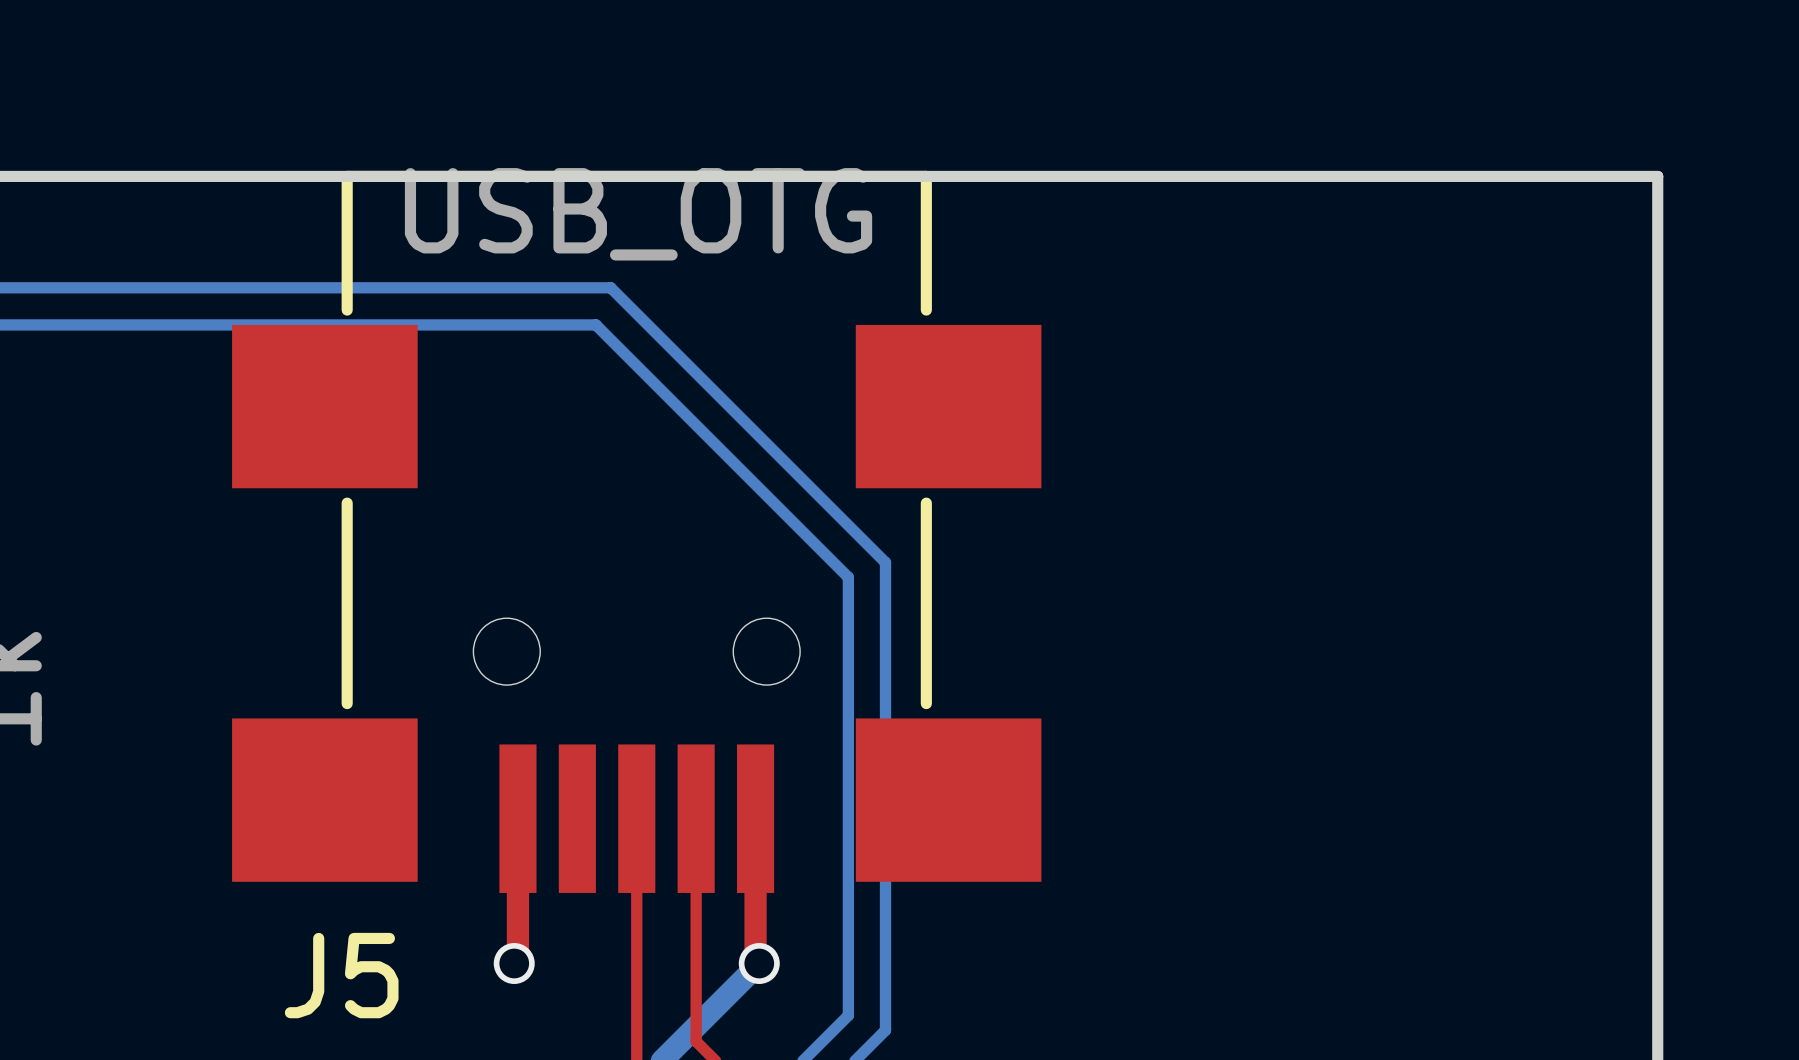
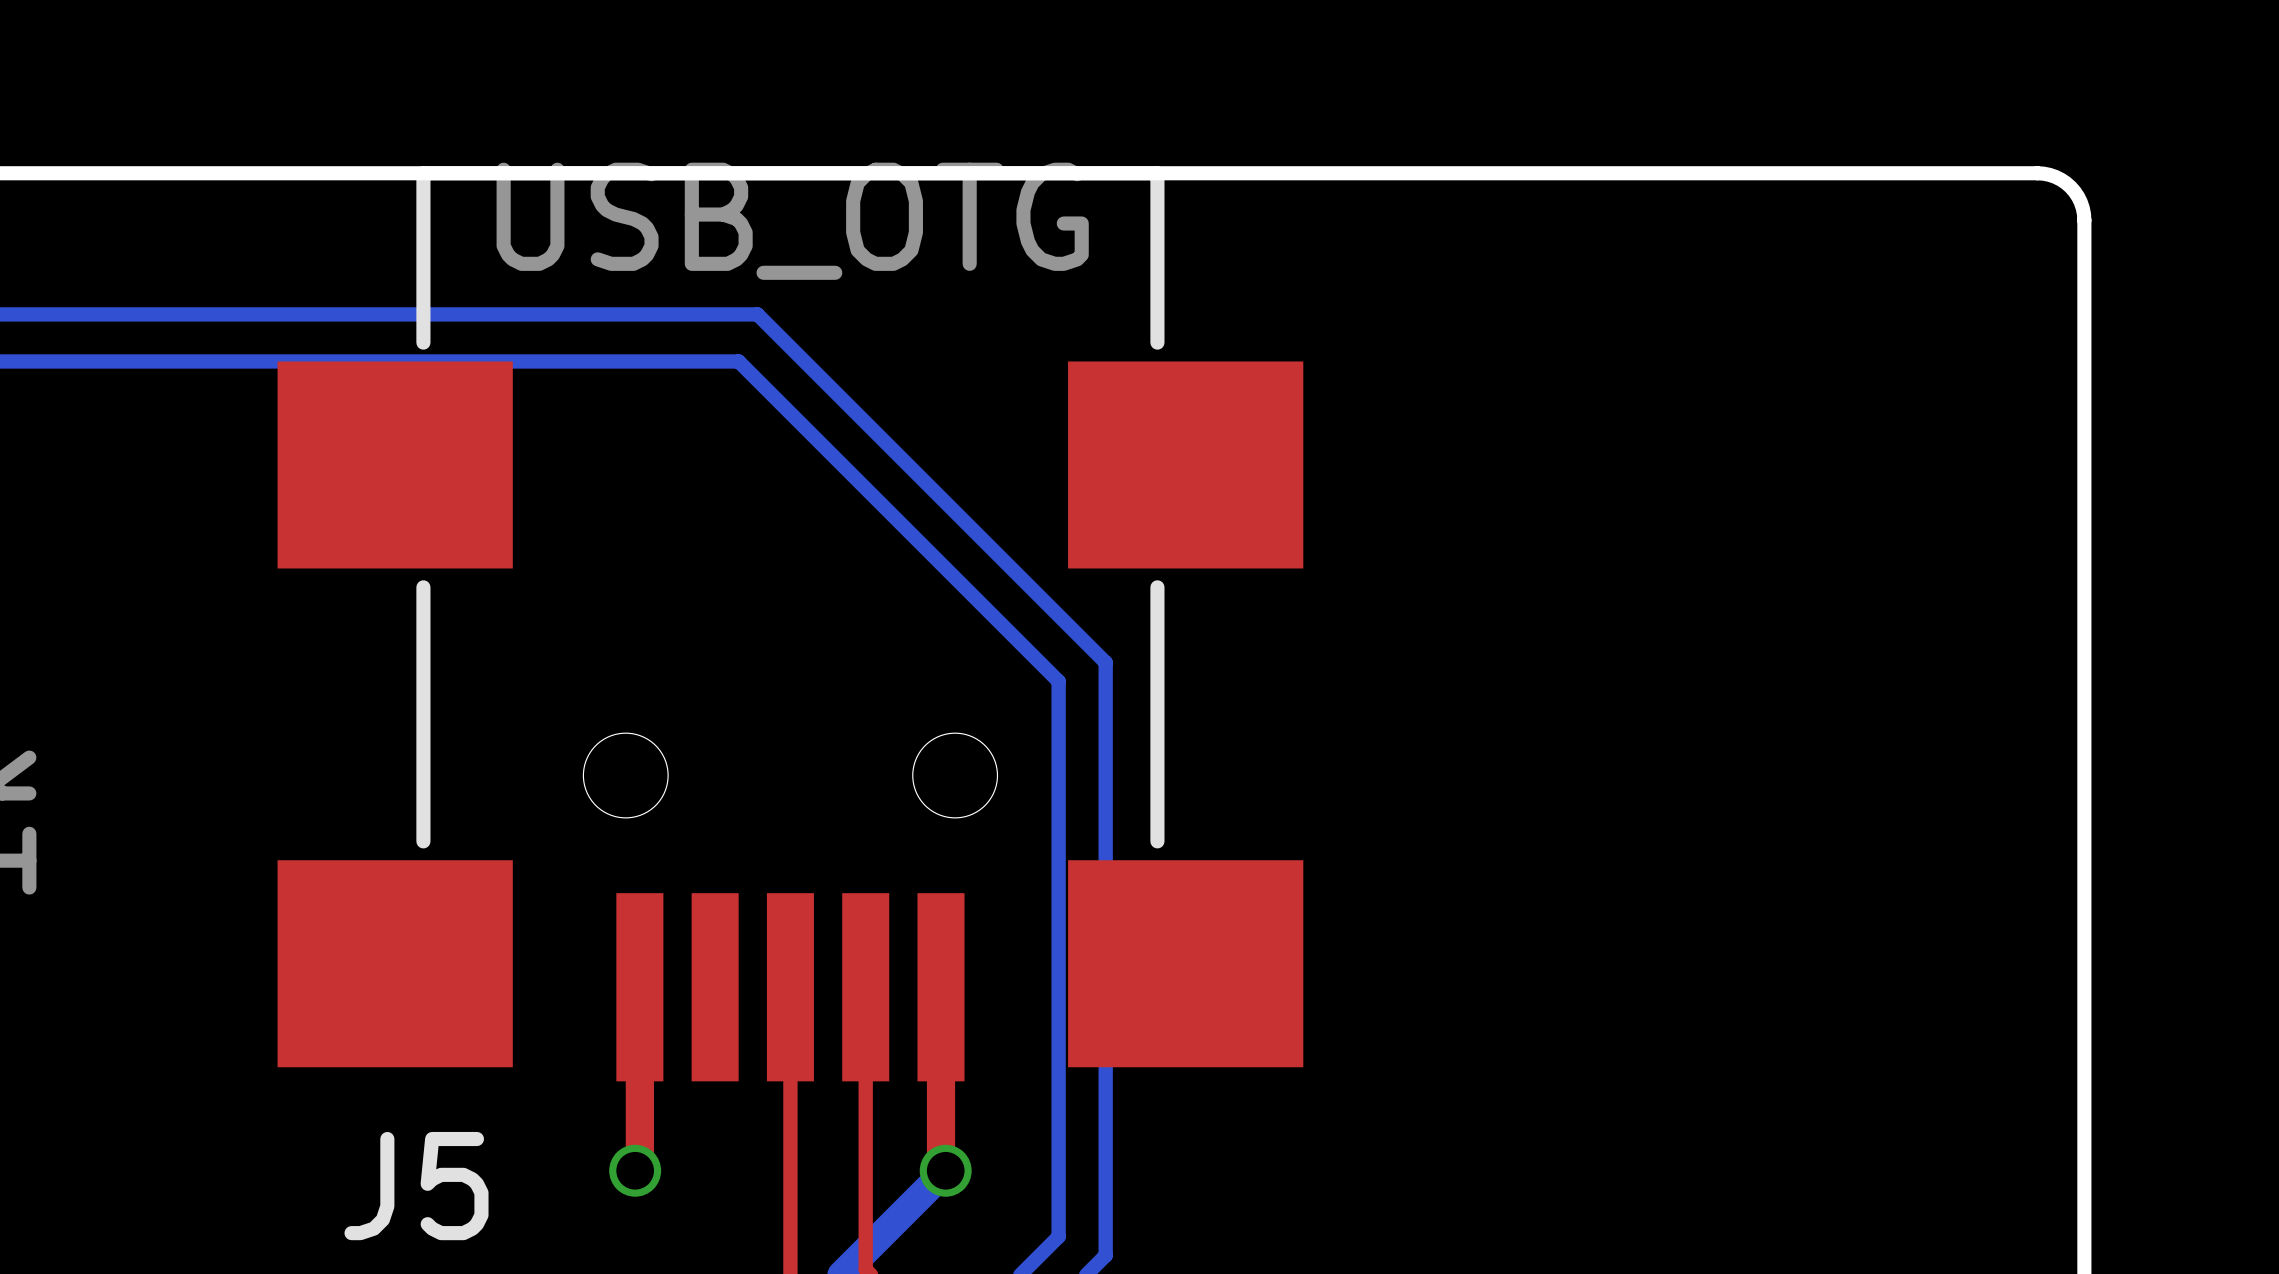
board edge: (1620, 176) (1657, 176) (1657, 213) -> (2037, 173) (2055, 176) (2070, 187) (2080, 202) (2084, 220)

